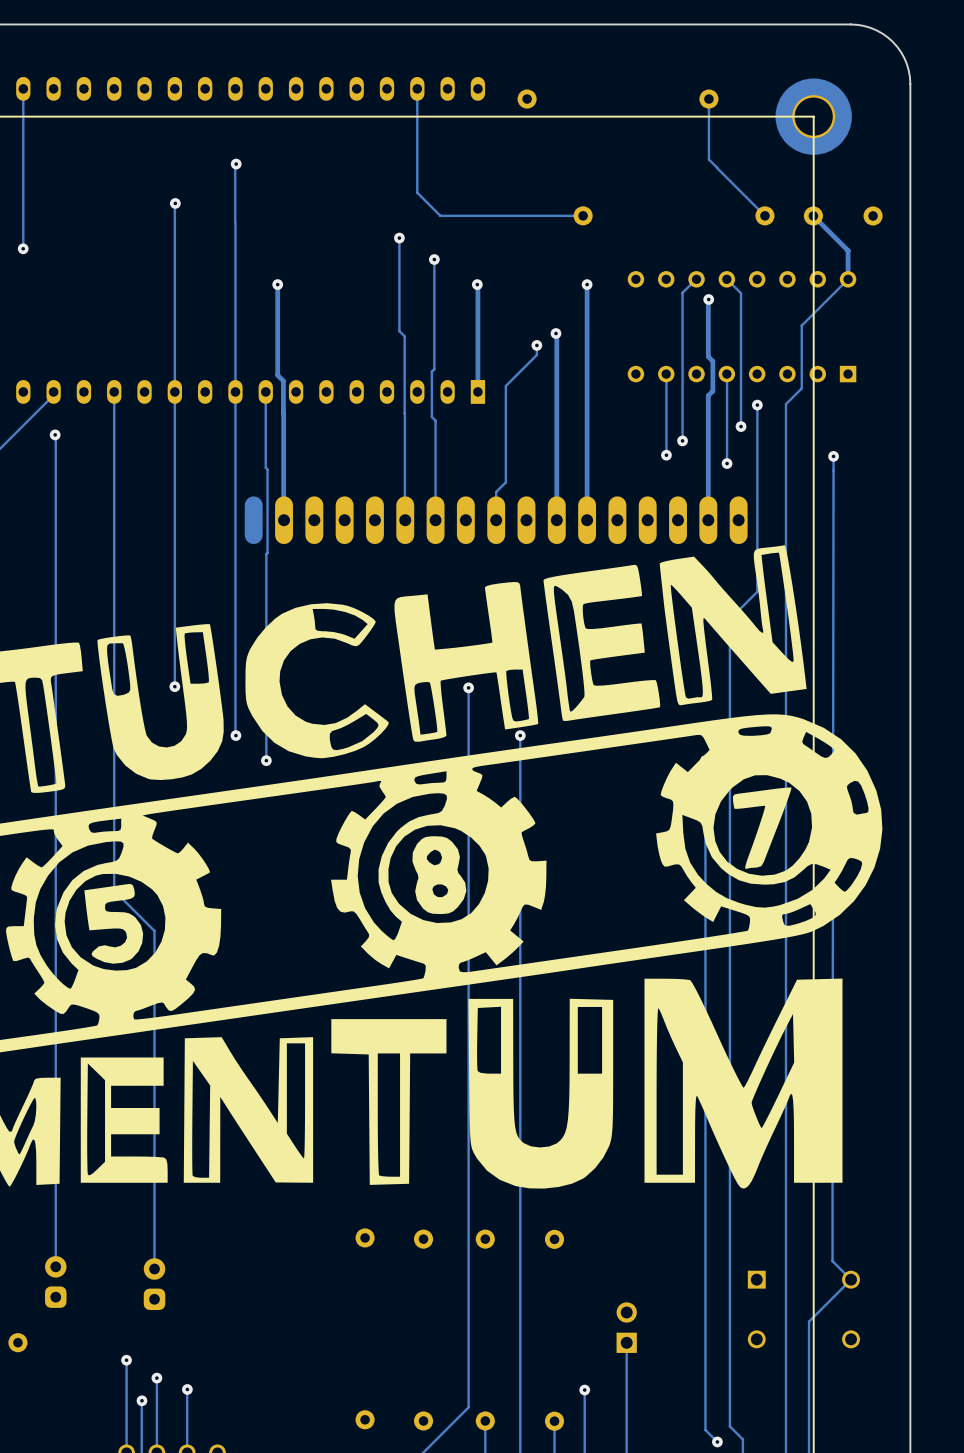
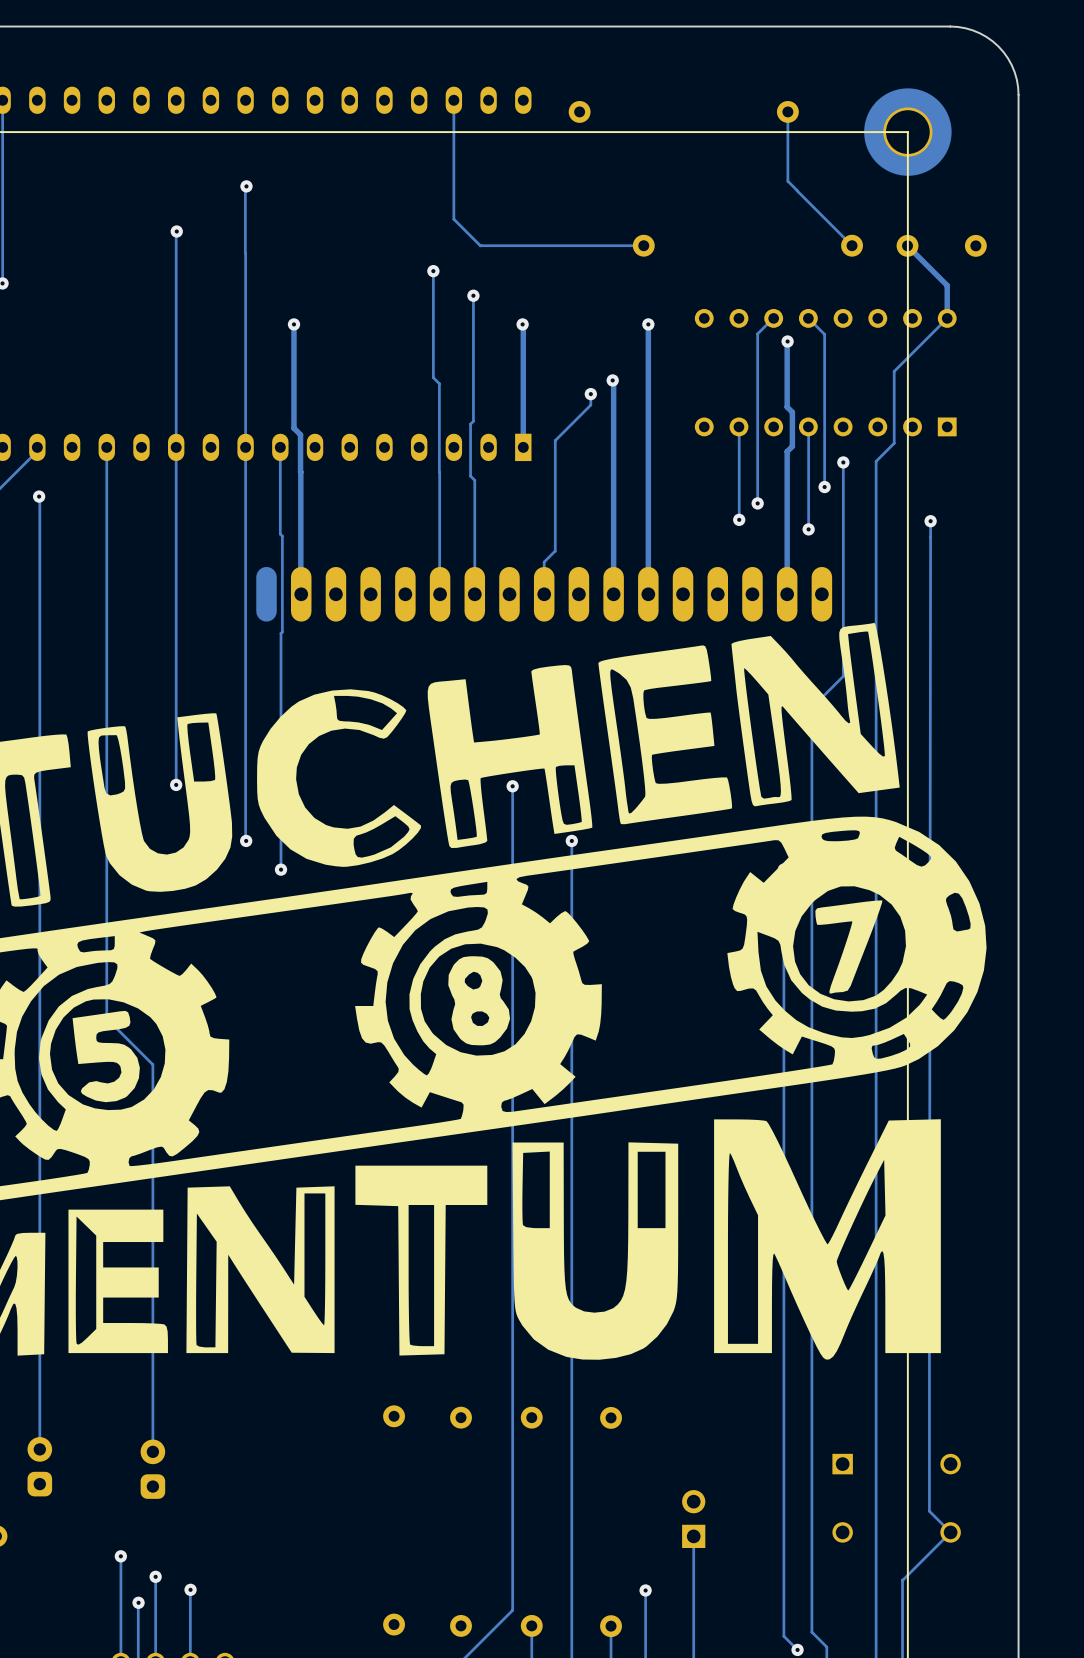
track: (832, 1261) (851, 1279) (809, 1321) (809, 1381) -> (929, 1442) (929, 1511) (950, 1532) (902, 1580)

